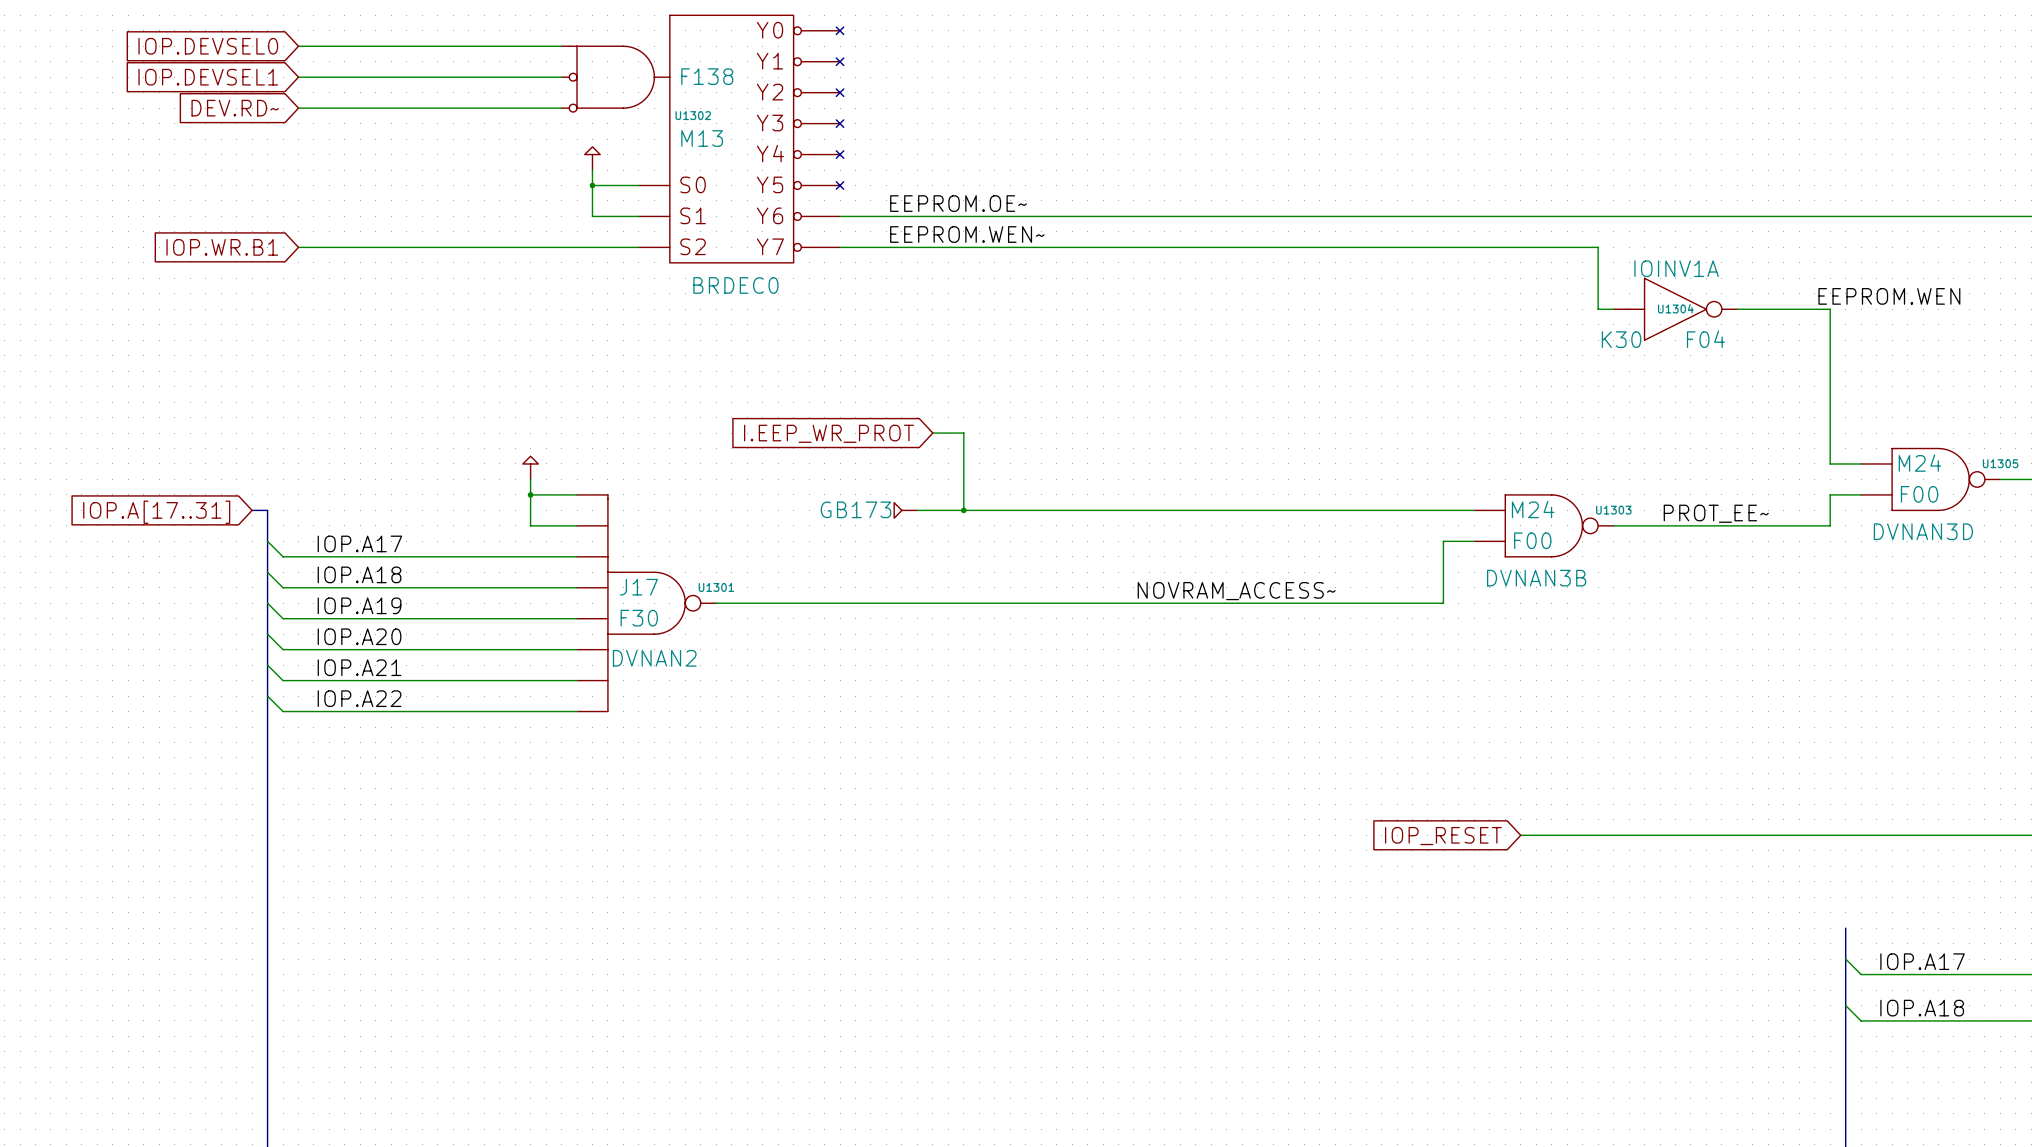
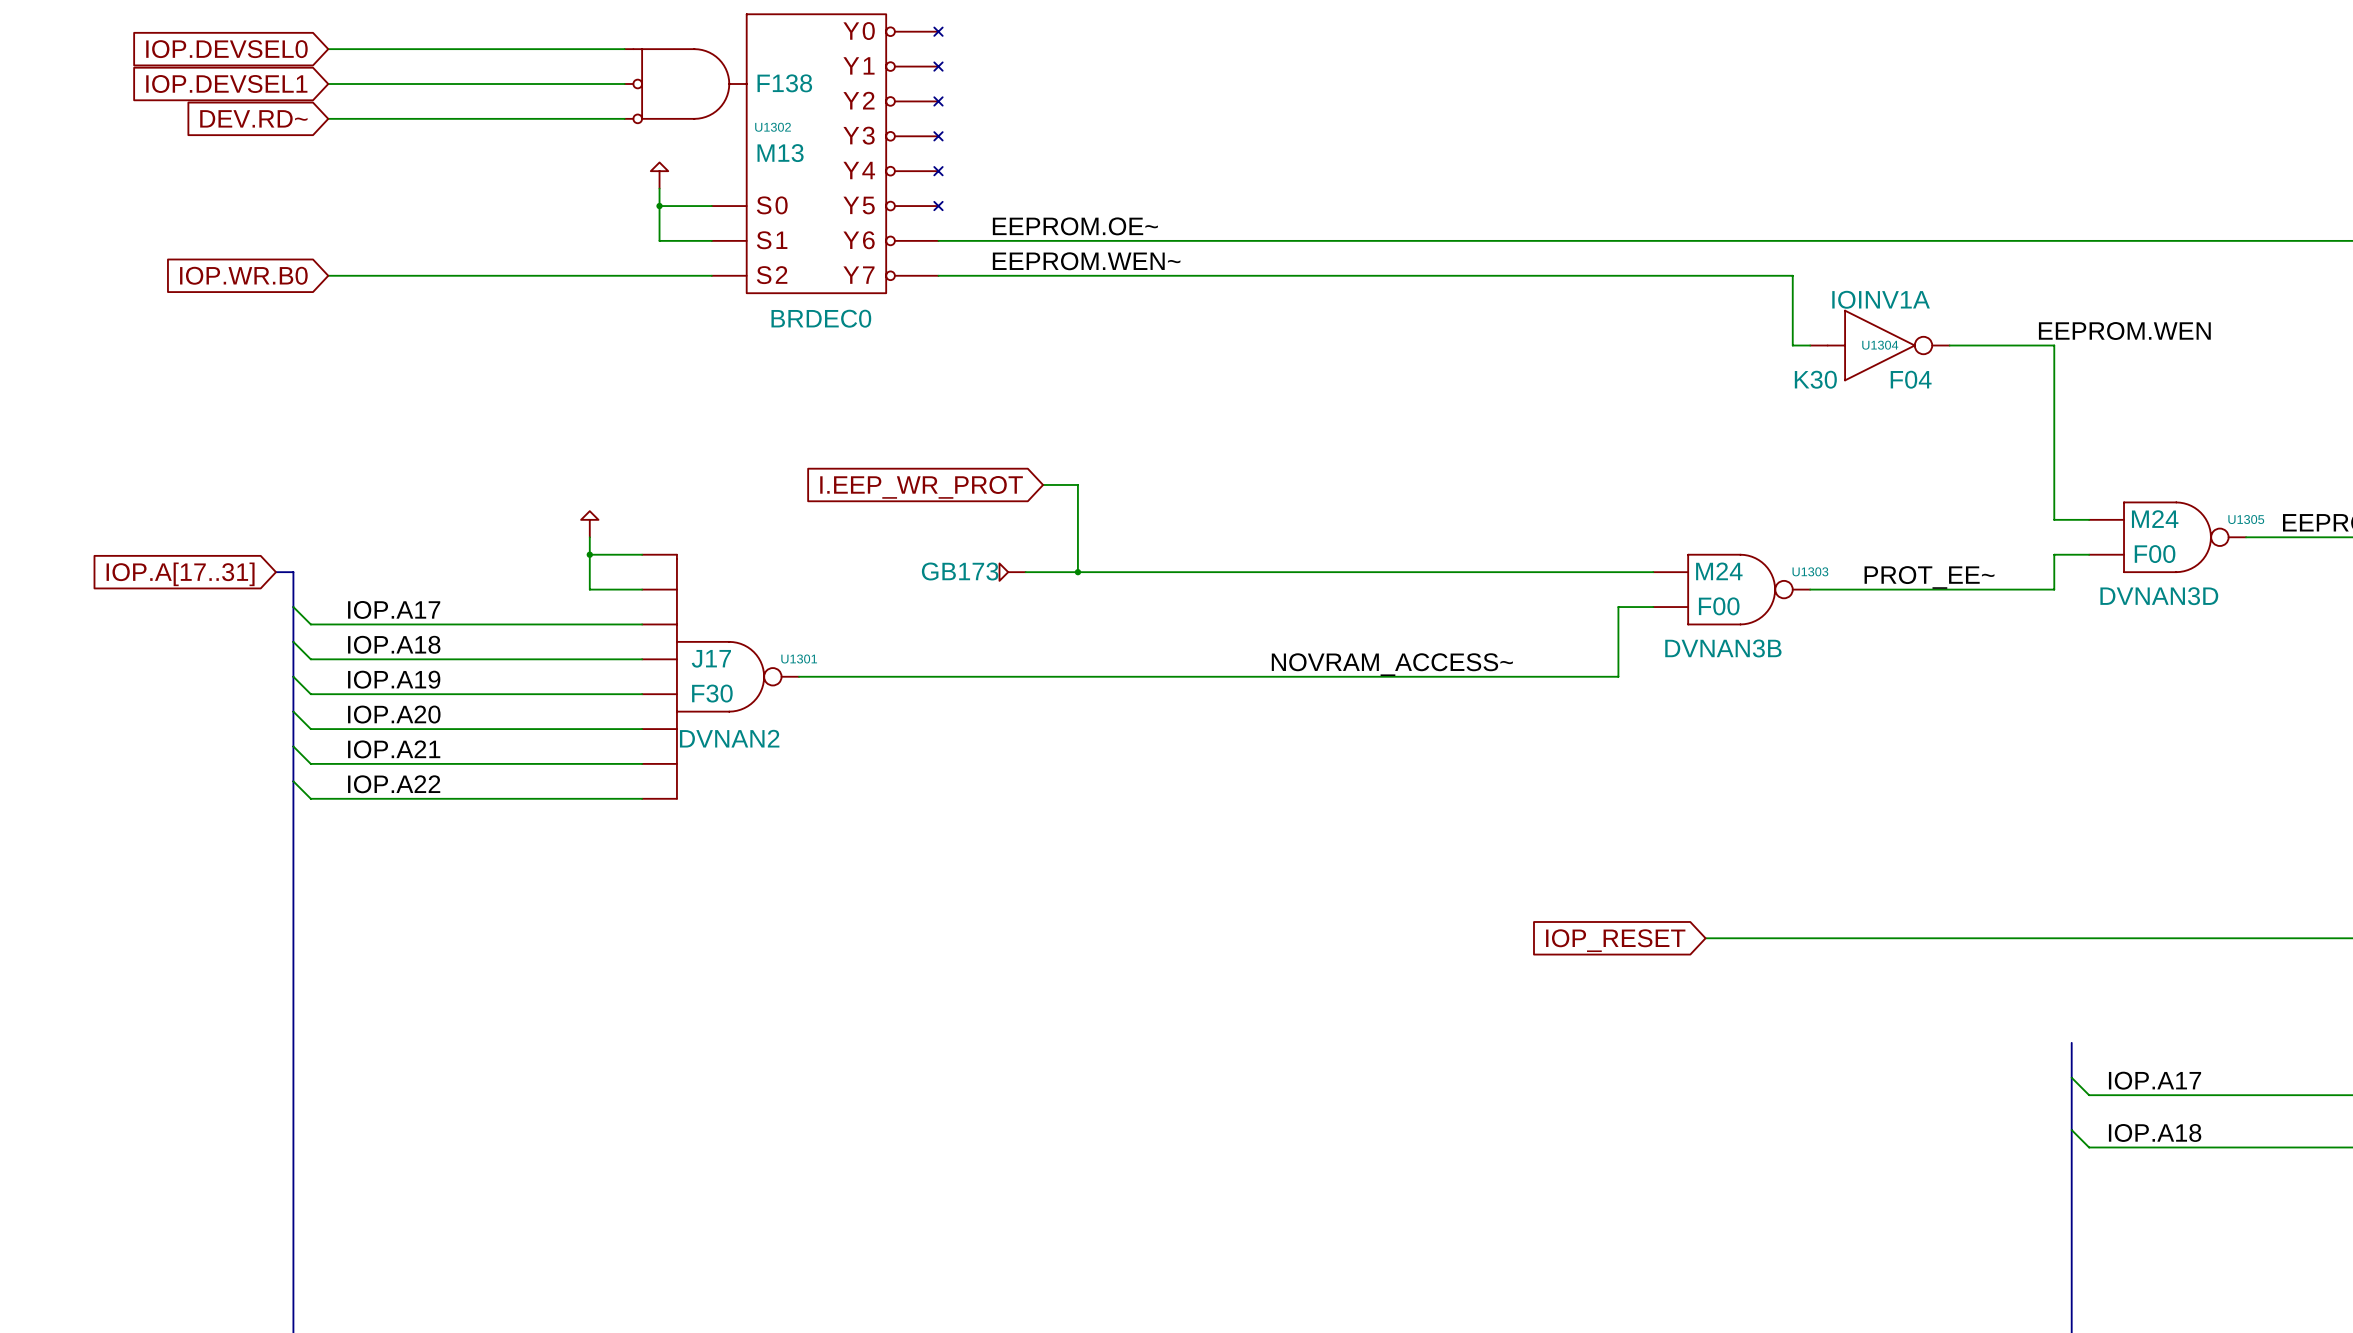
global label: IOP.WR.B1 (222, 247) -> IOP.WR.B0 (243, 275)

